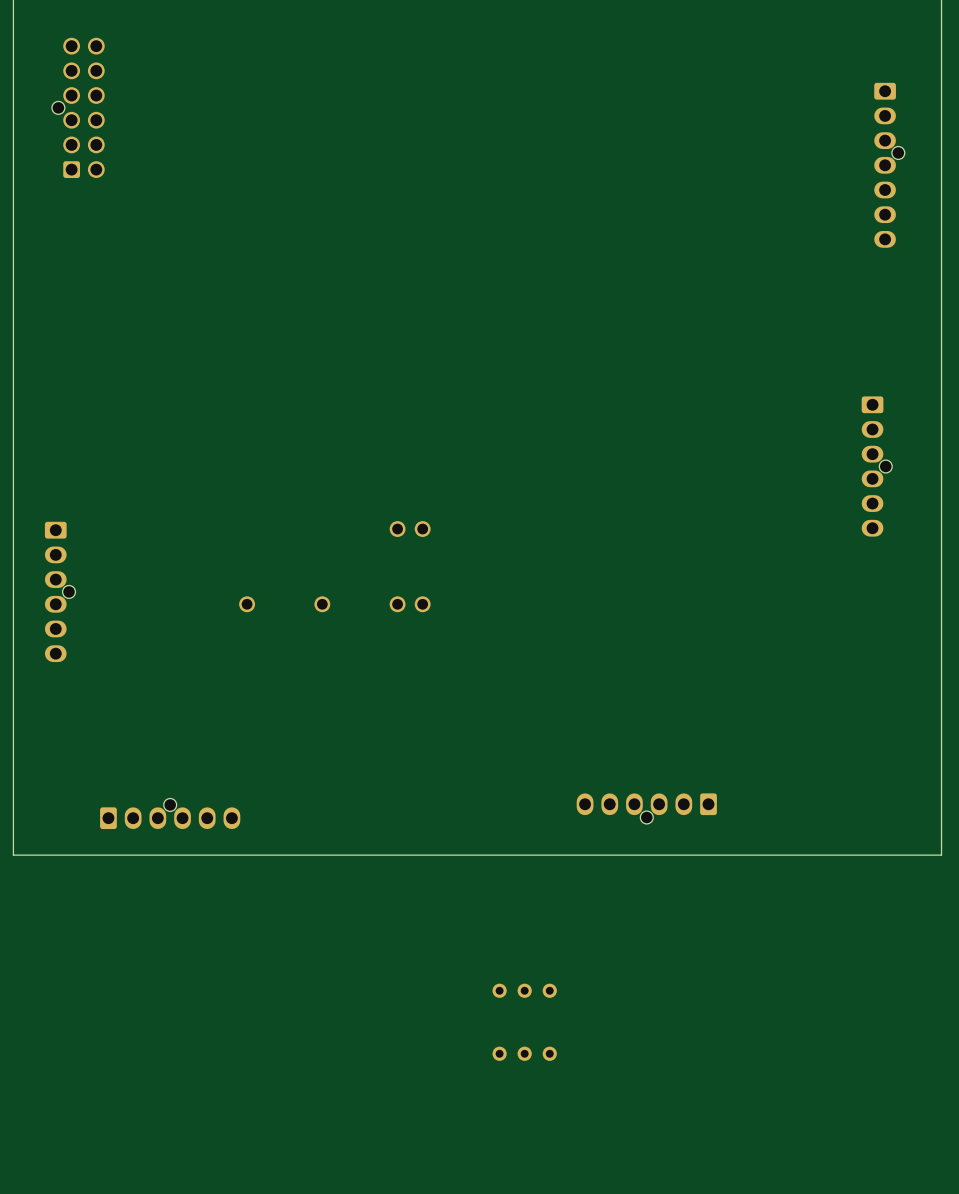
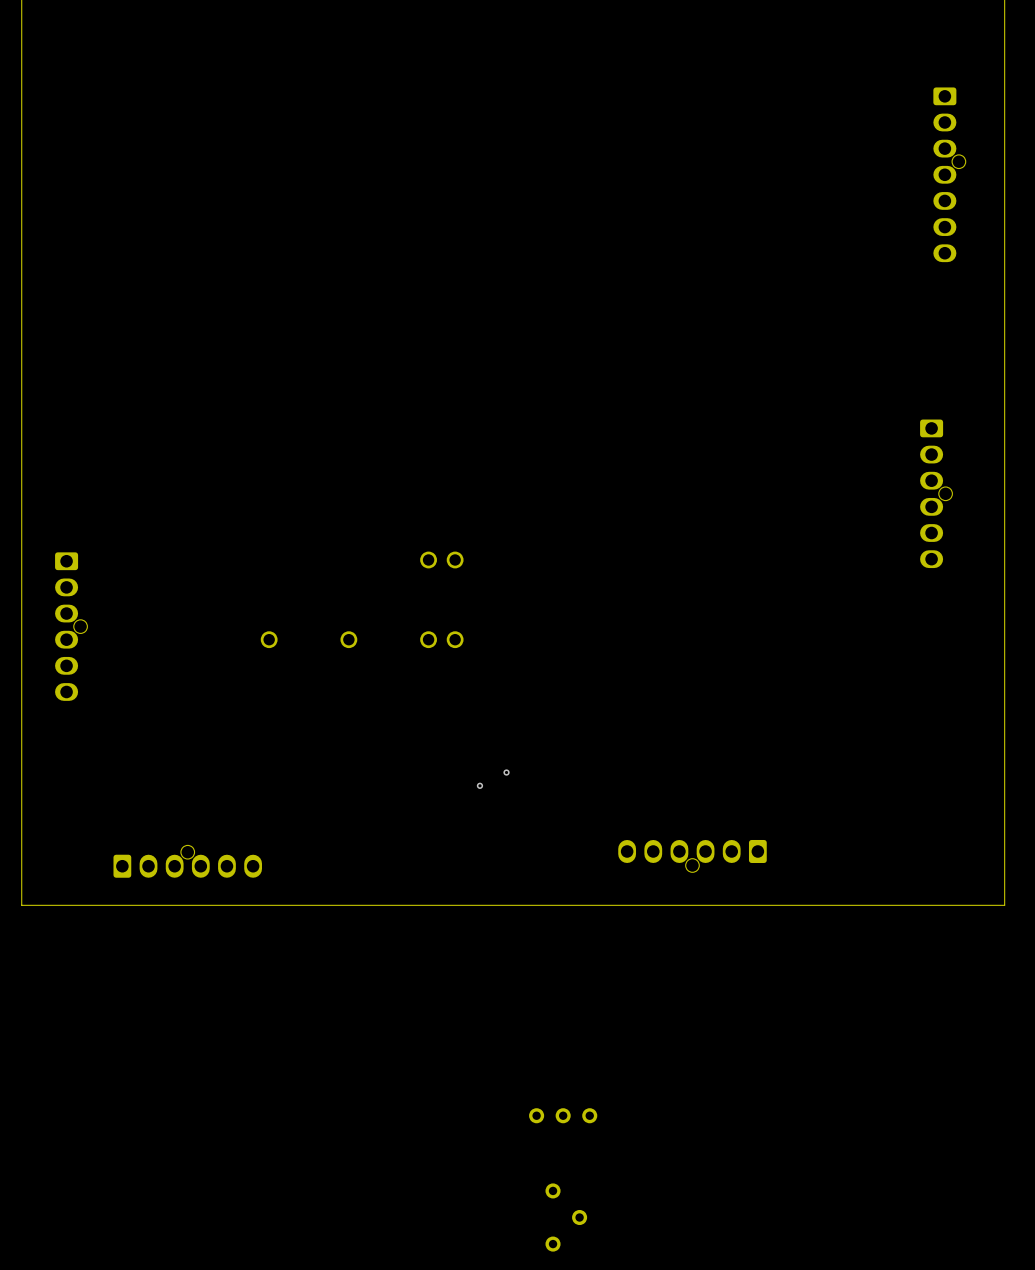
part: (78, 107) -> none
via: none -> (506, 772)
via: none -> (479, 785)
part: (524, 990) -> none
part: none -> (566, 1217)

